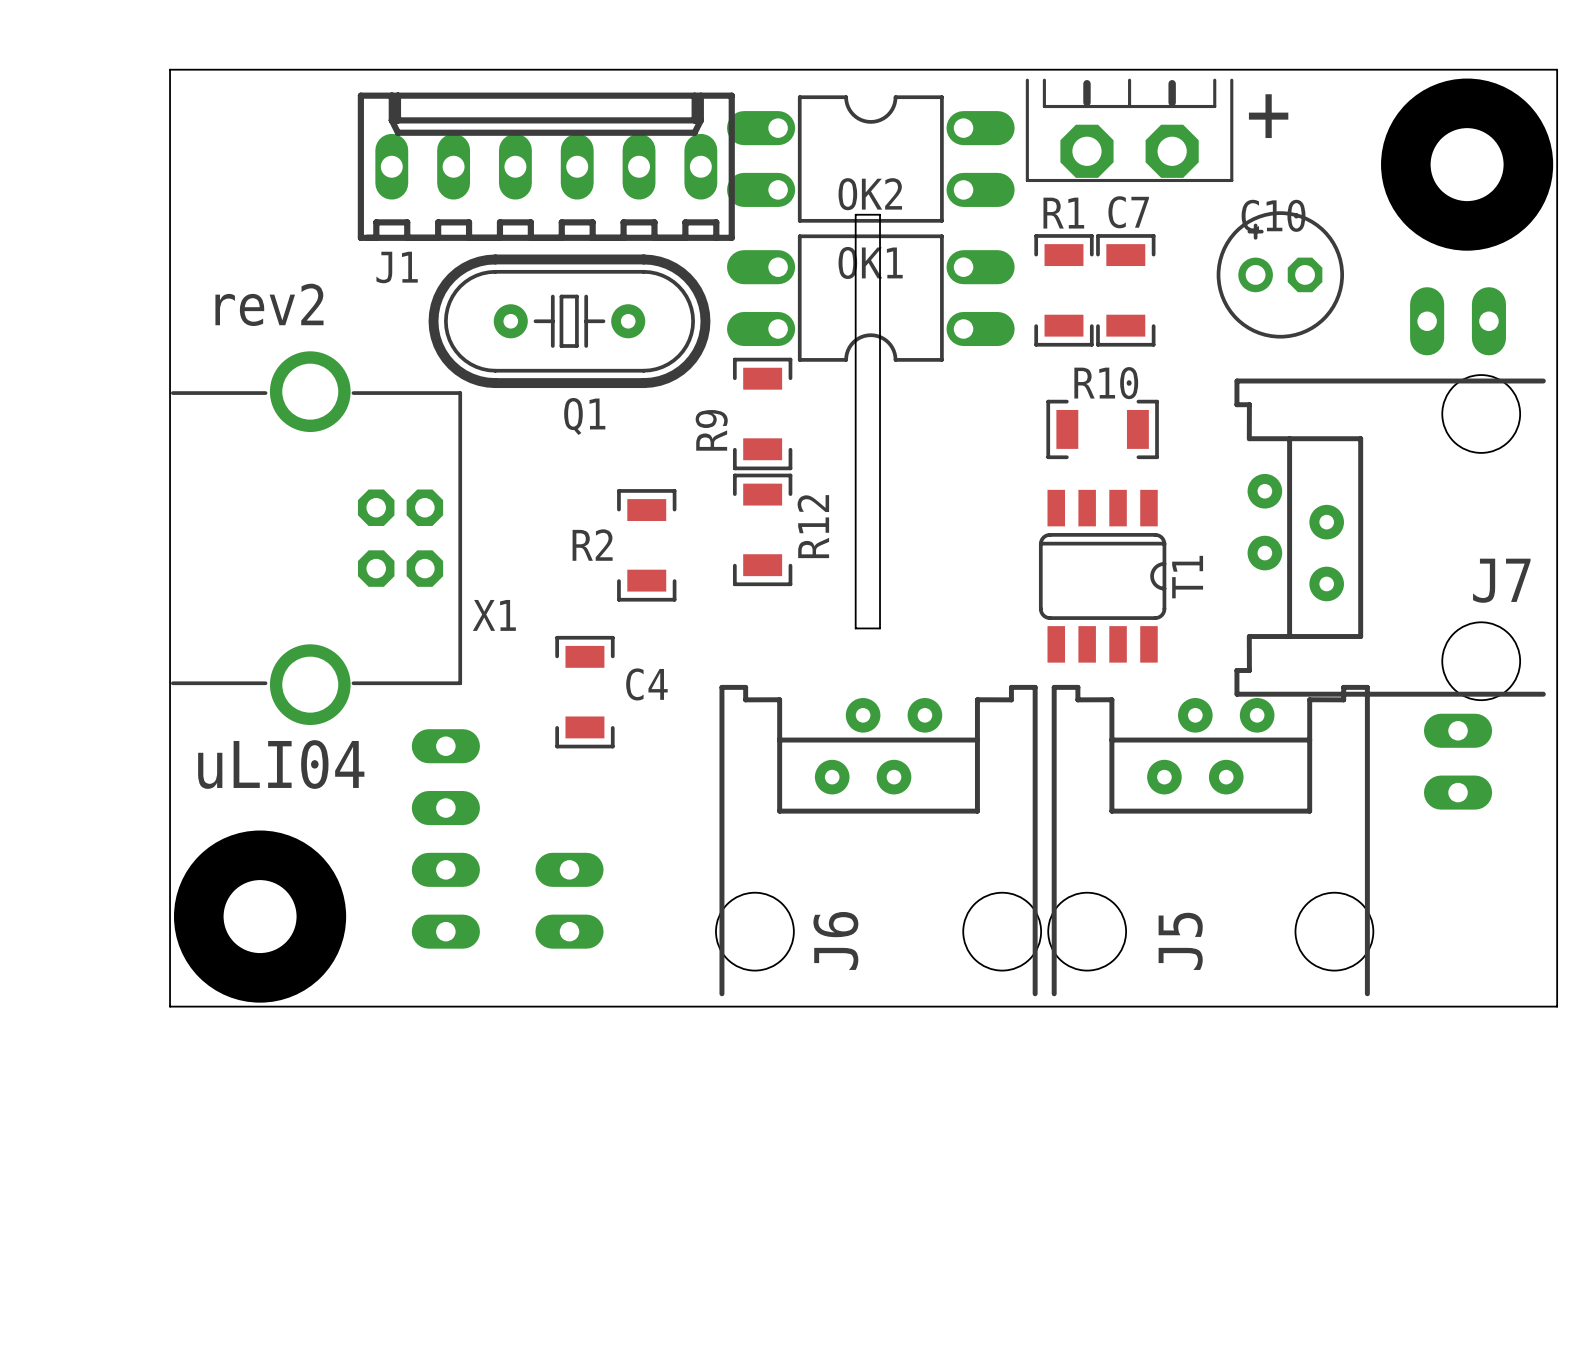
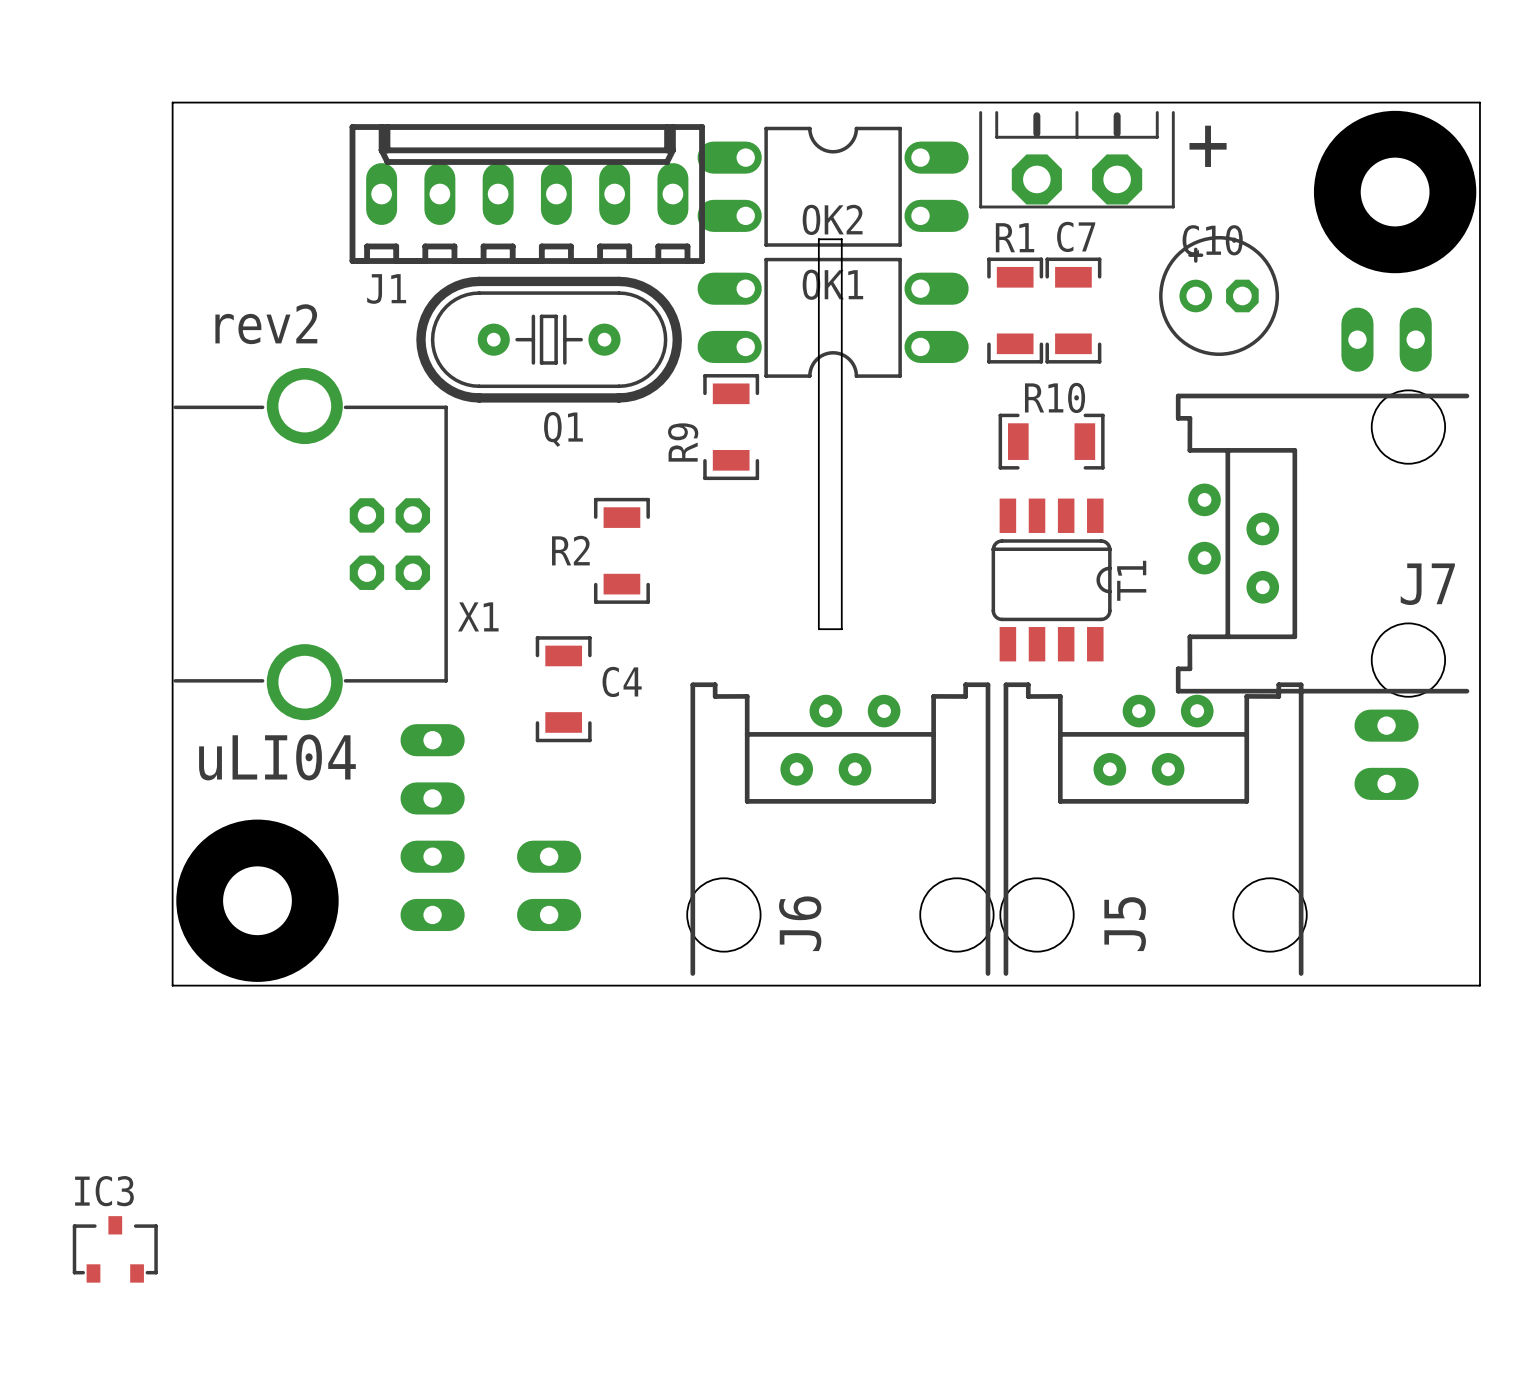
R12: (762, 529) -> none
IC3: none -> (115, 1249)

